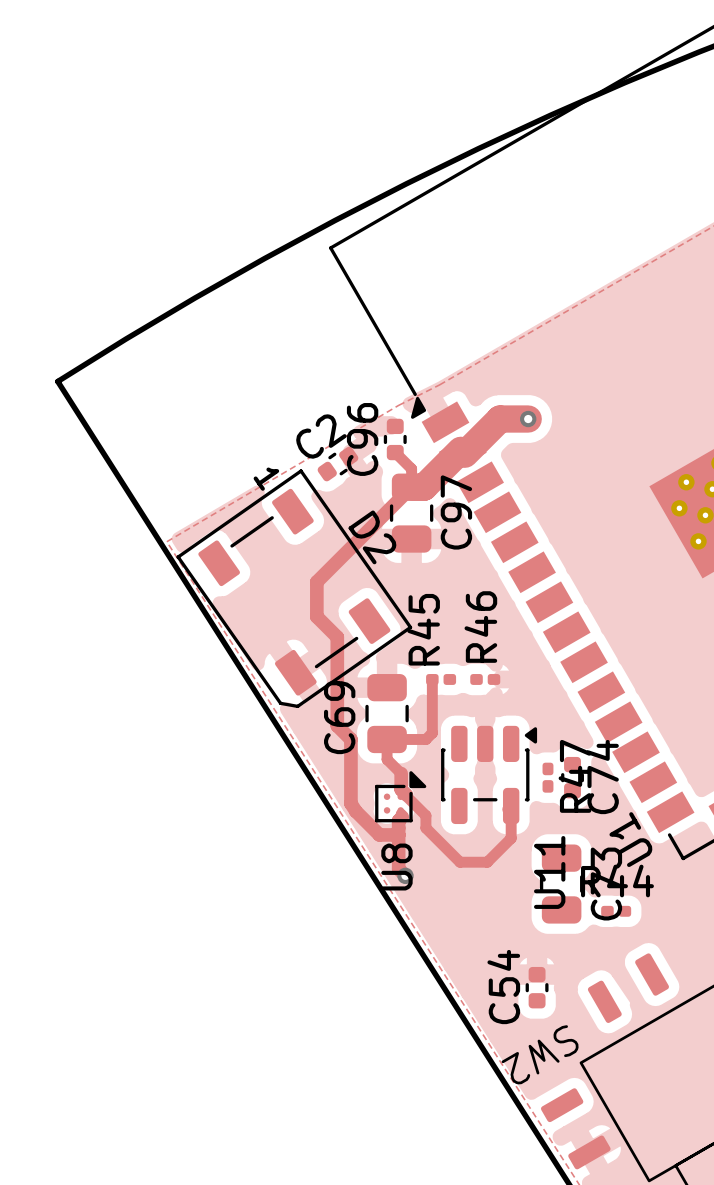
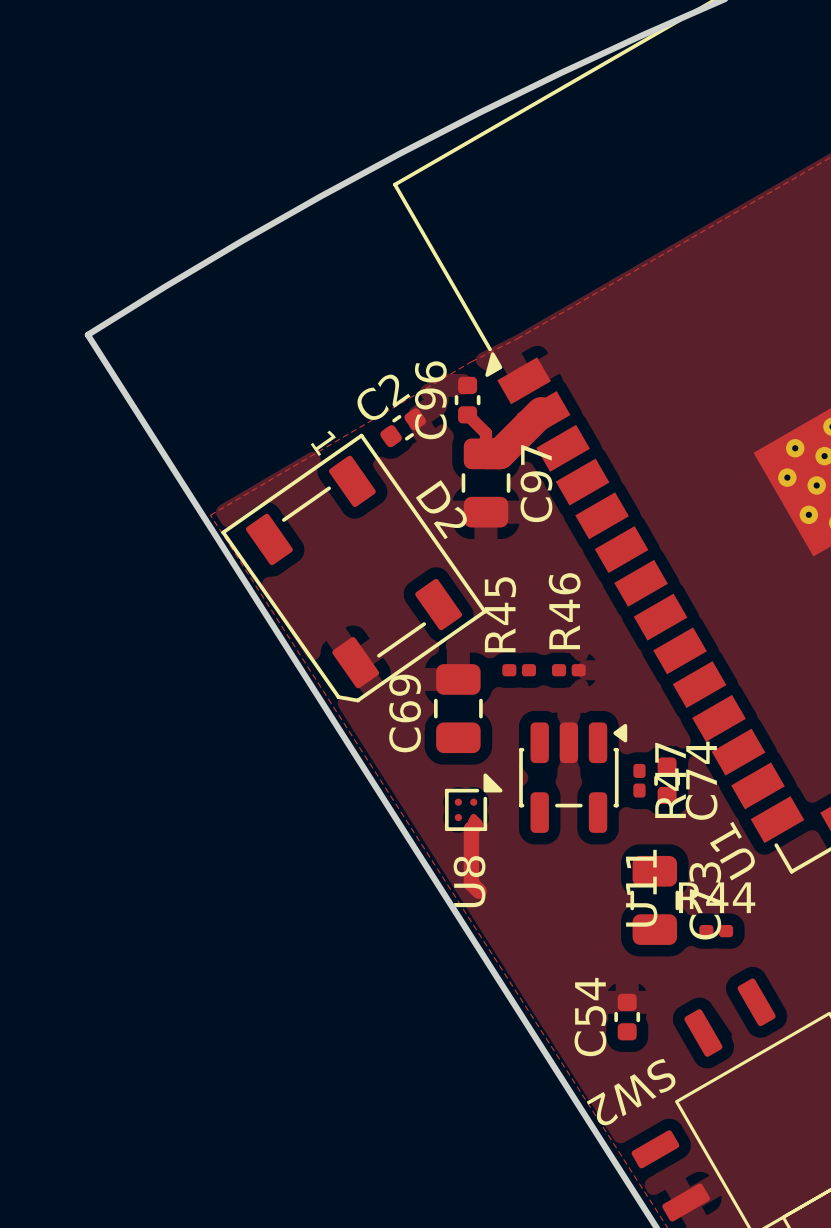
track: (528, 419) (500, 419) (464, 454) -> none
via: (528, 419) -> none
track: (411, 487) (316, 581) (316, 616) (337, 637) (337, 725) (350, 739) (350, 803) (355, 811) (379, 834) (398, 834) -> none
track: (432, 679) (432, 733) (425, 739) (387, 739) (387, 759) (401, 773) (401, 789) (406, 794) -> none
track: (406, 796) (425, 815) (425, 828) (460, 862) (487, 862) (511, 838) (511, 805) (507, 809) -> none
via: (405, 875) -> none

